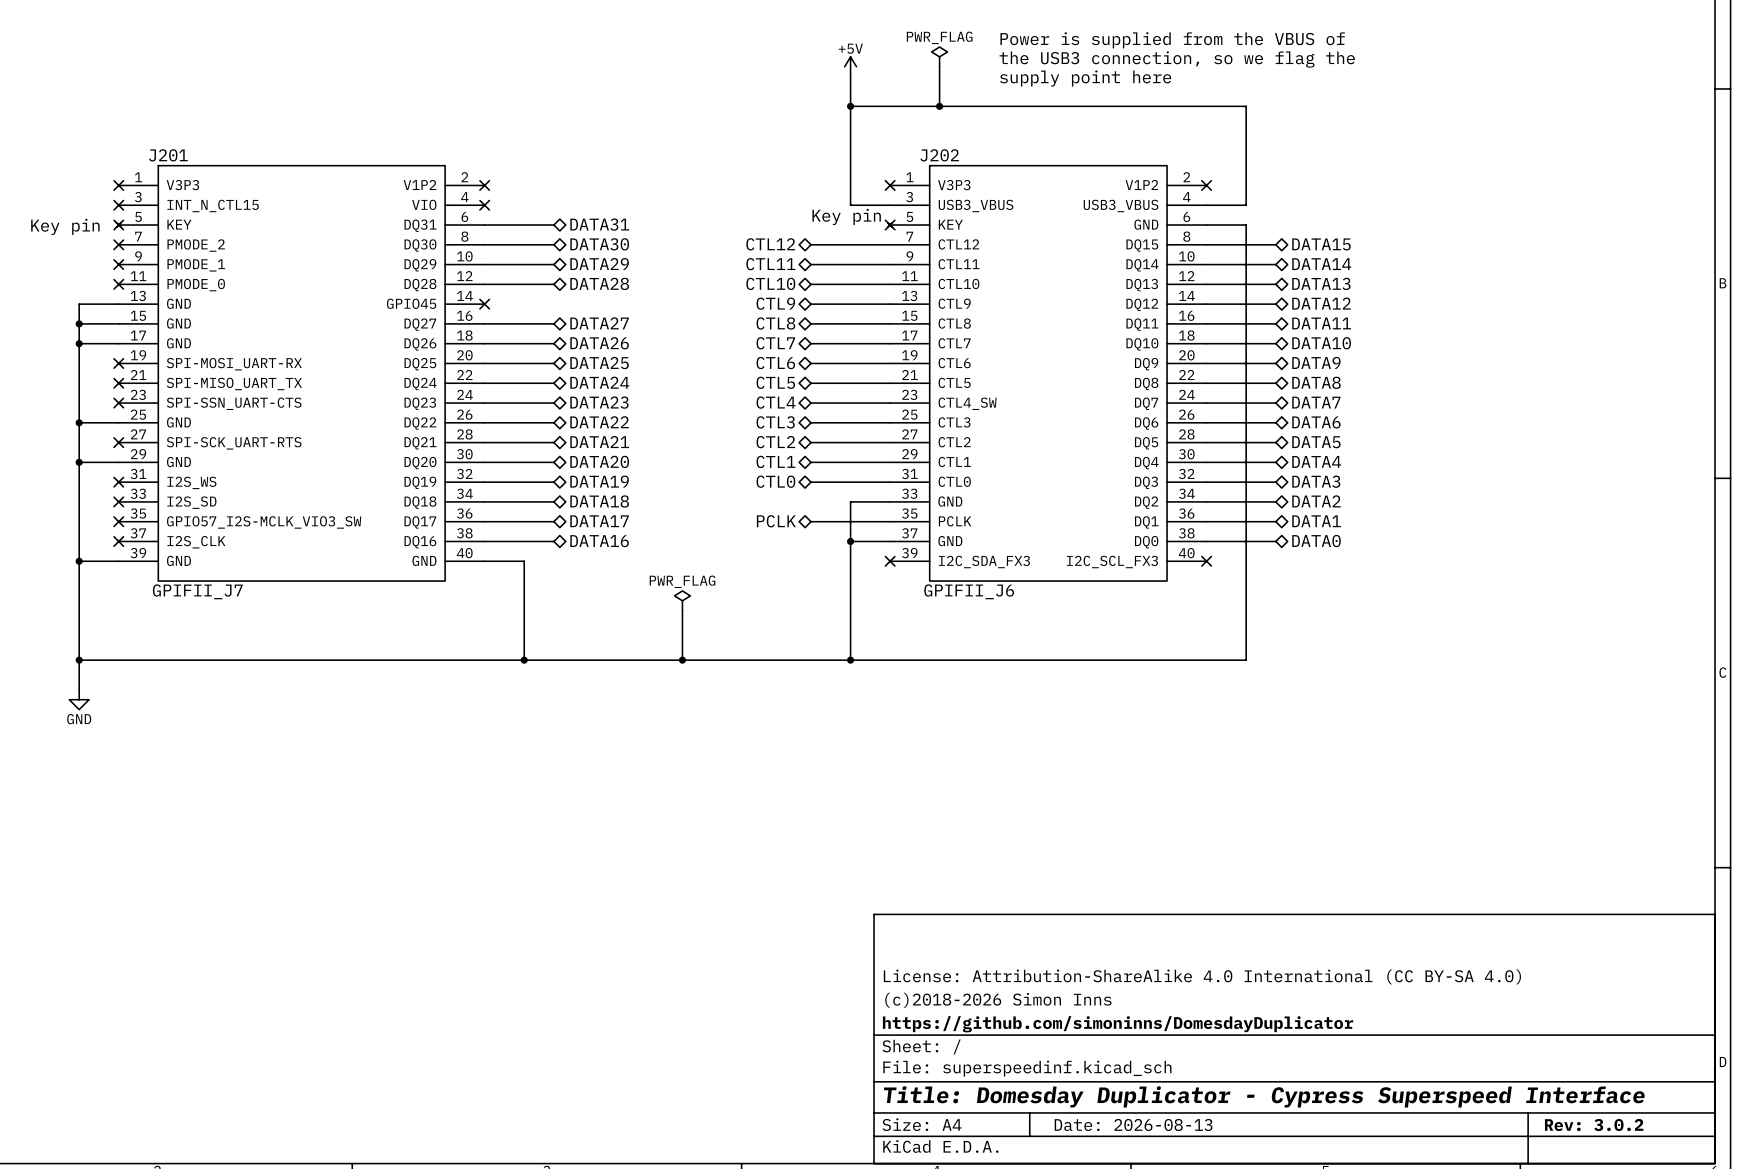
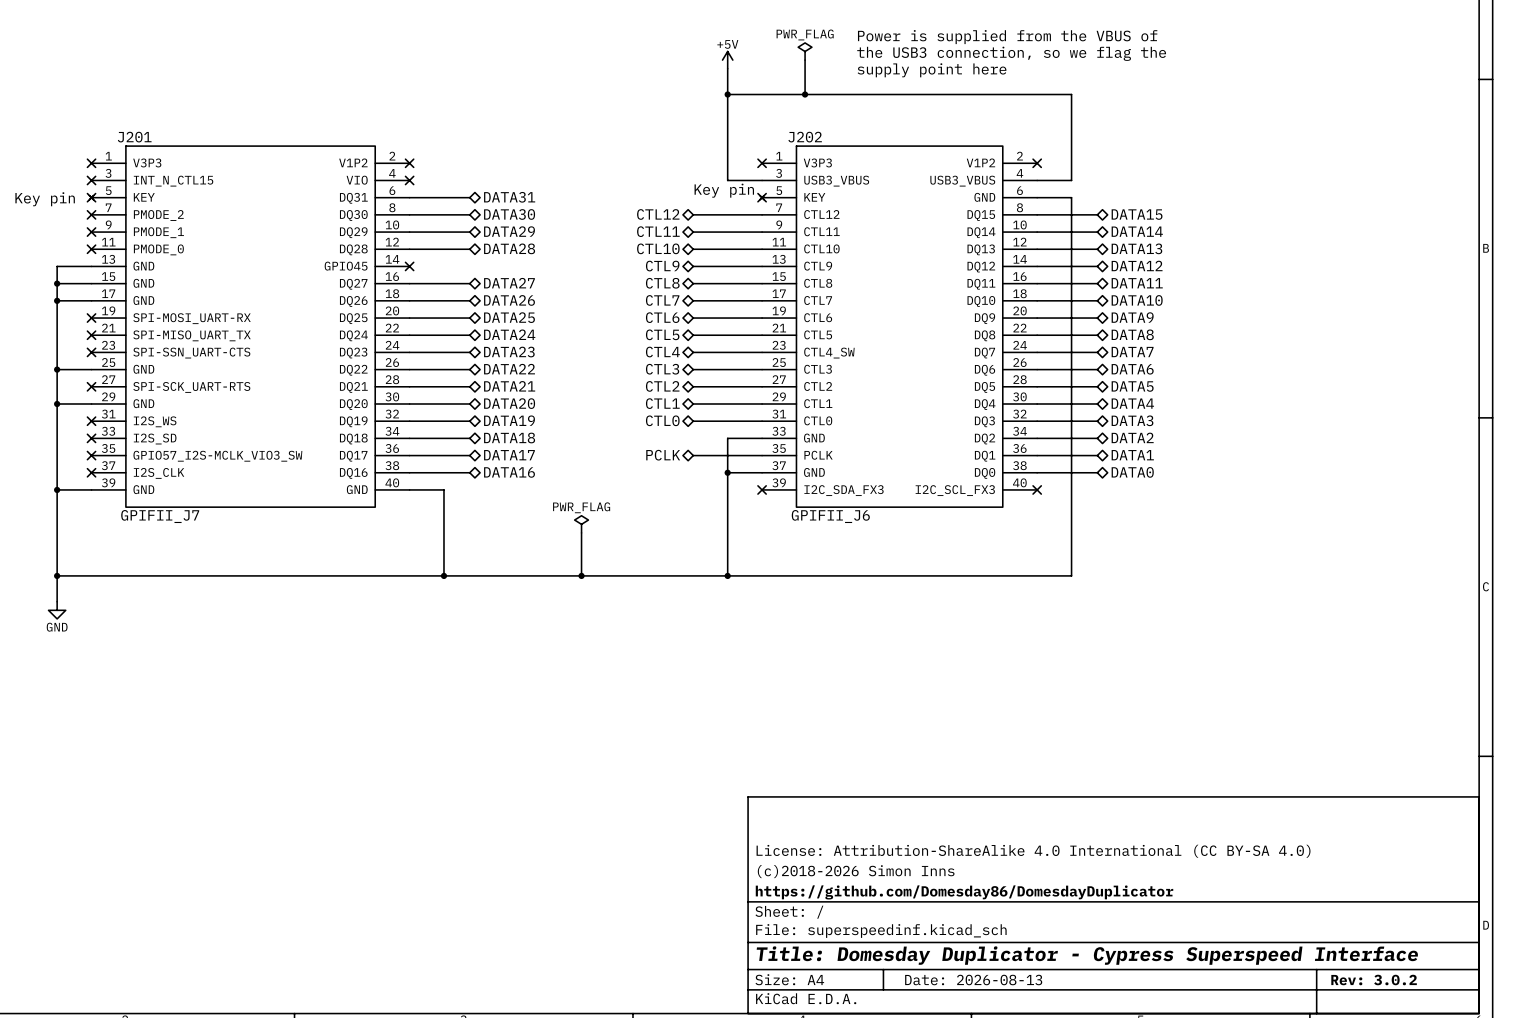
title block: https://github.com/simoninns/DomesdayDuplicator (1117, 1024) -> https://github.com/Domesday86/DomesdayDuplicator (964, 892)

